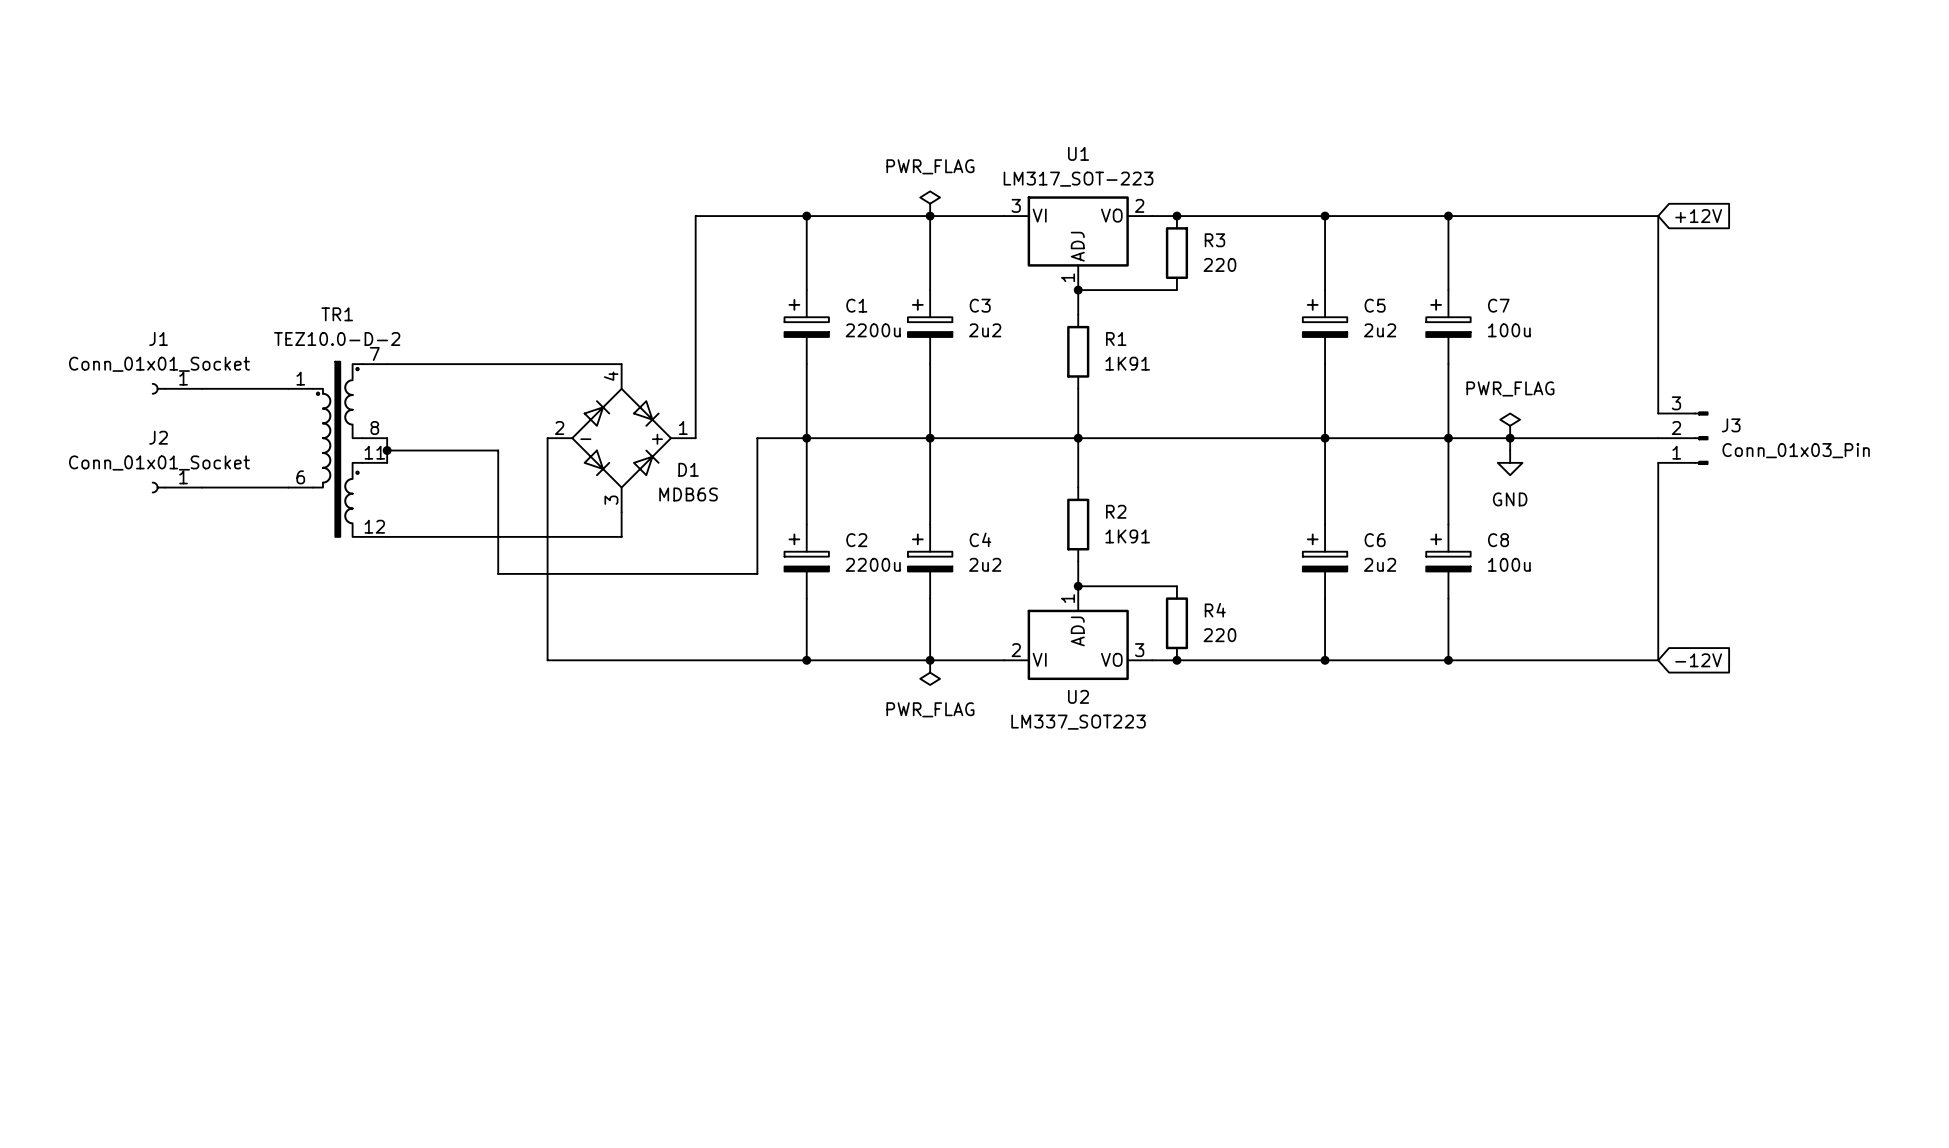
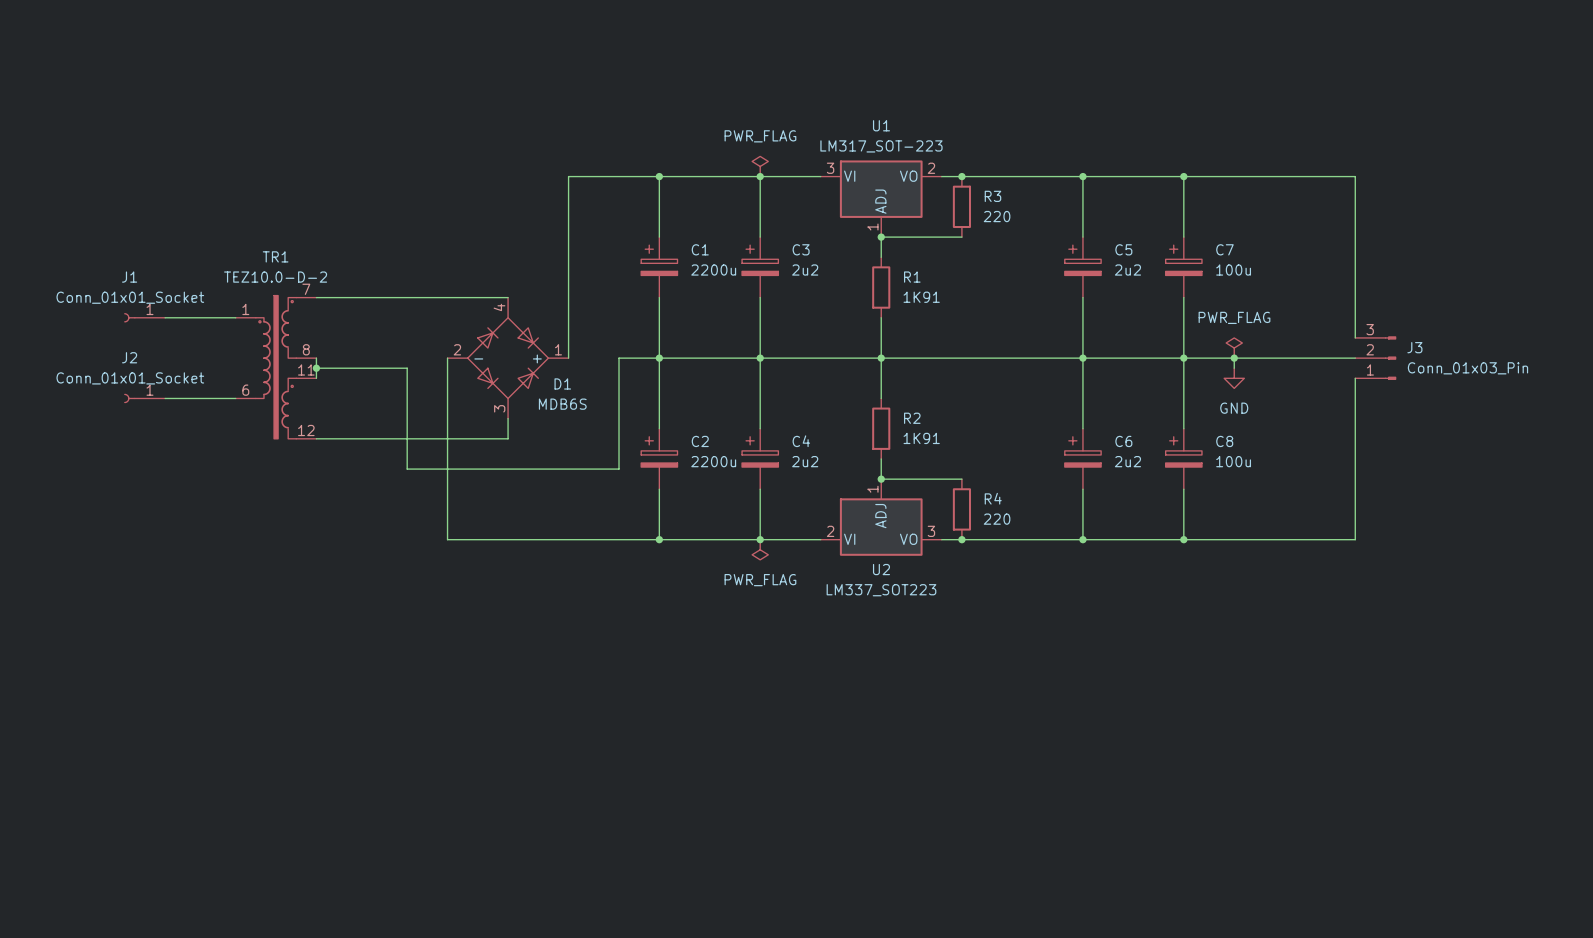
global label: +12V (1698, 216) -> none
global label: -12V (1698, 660) -> none

